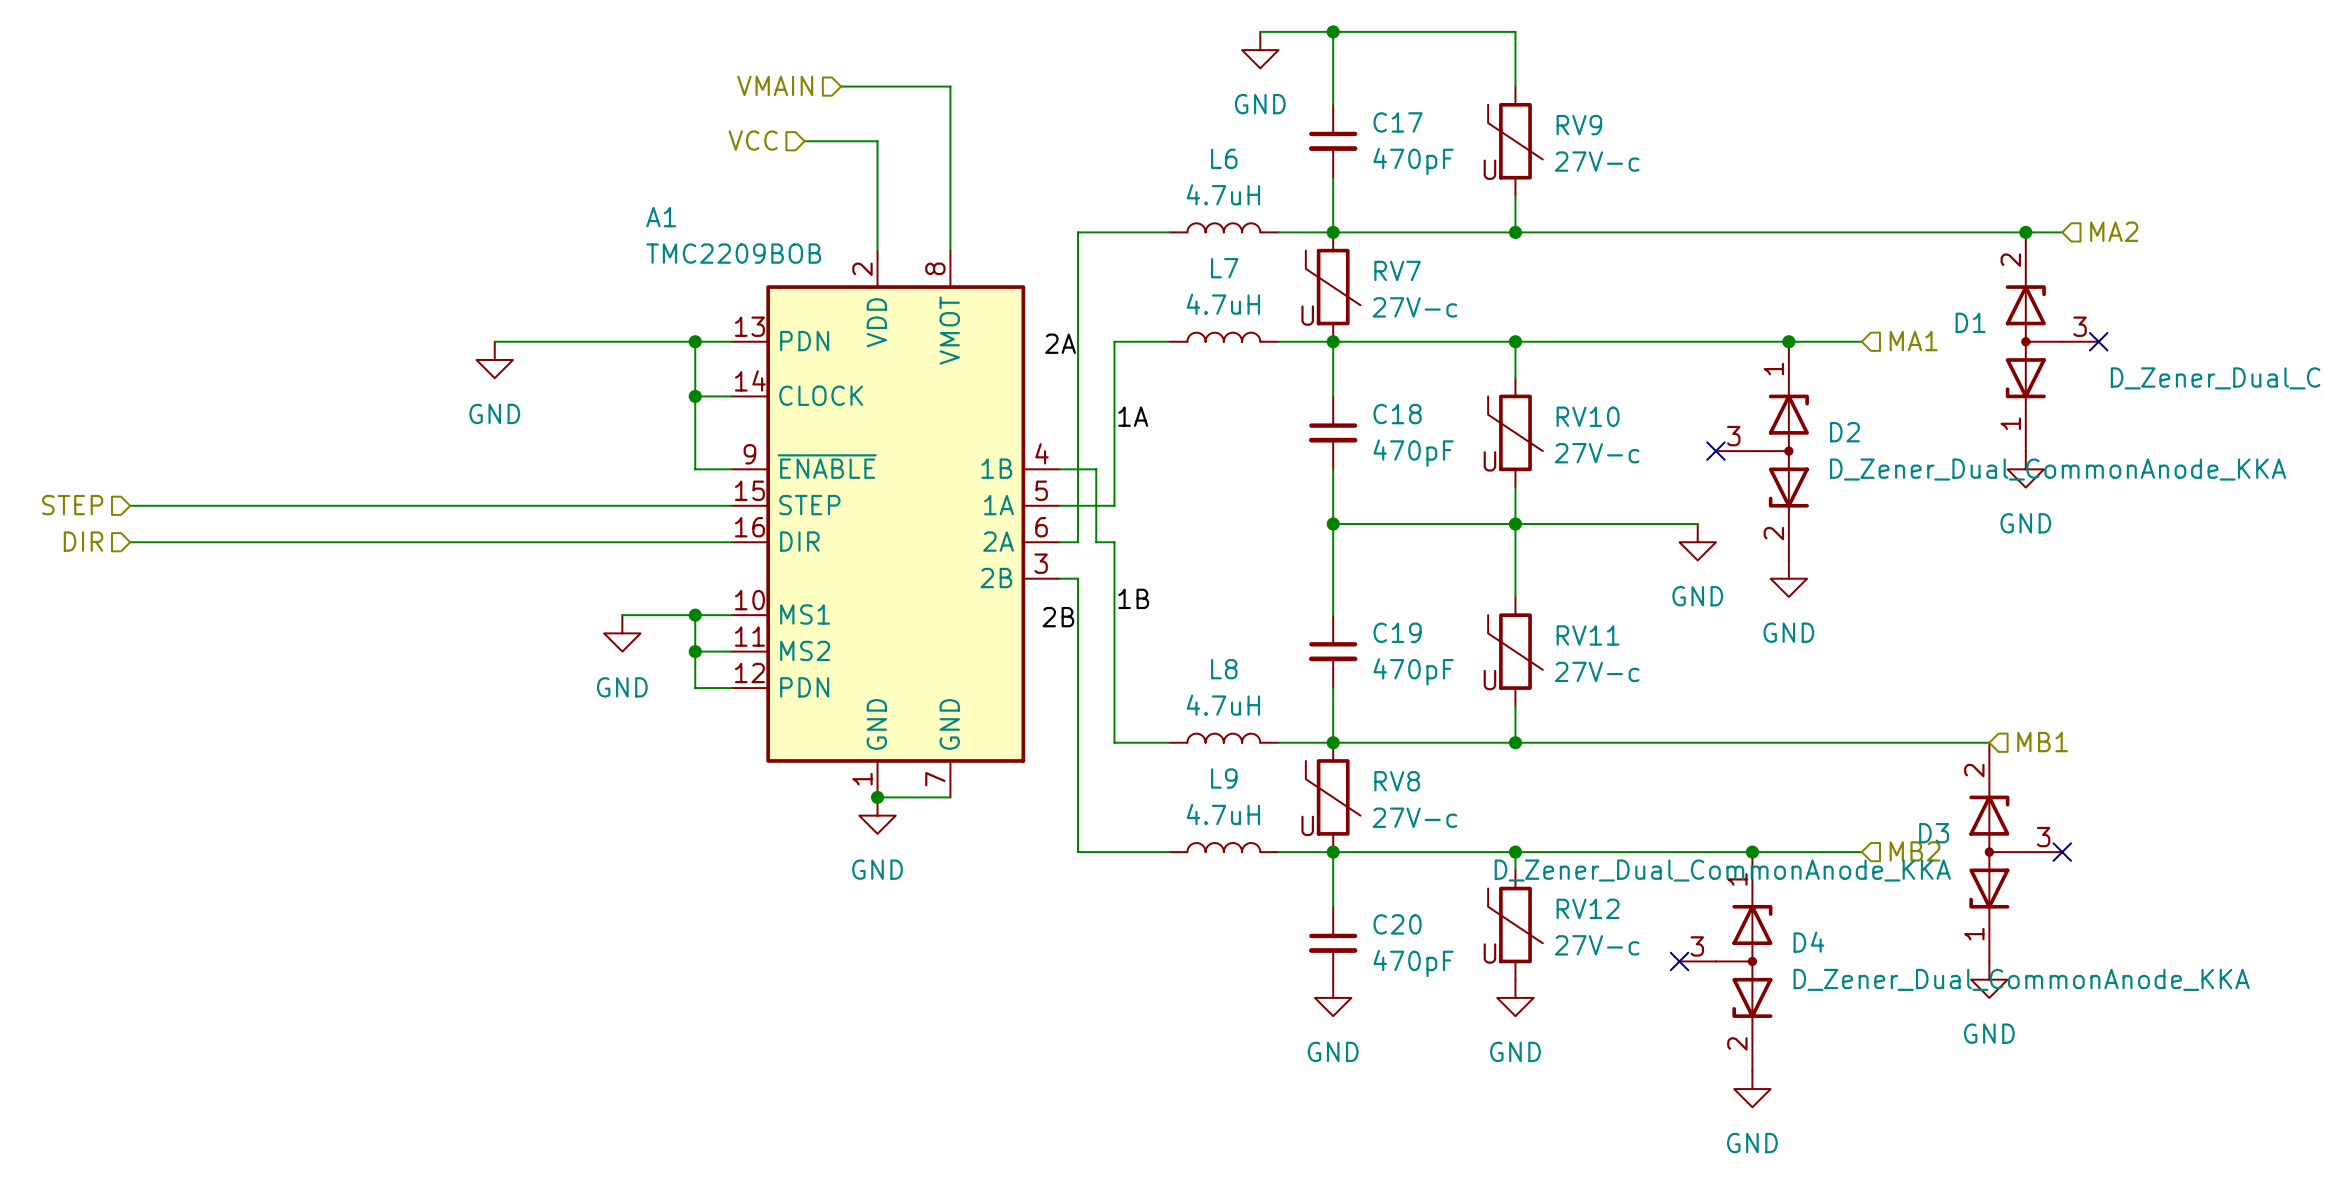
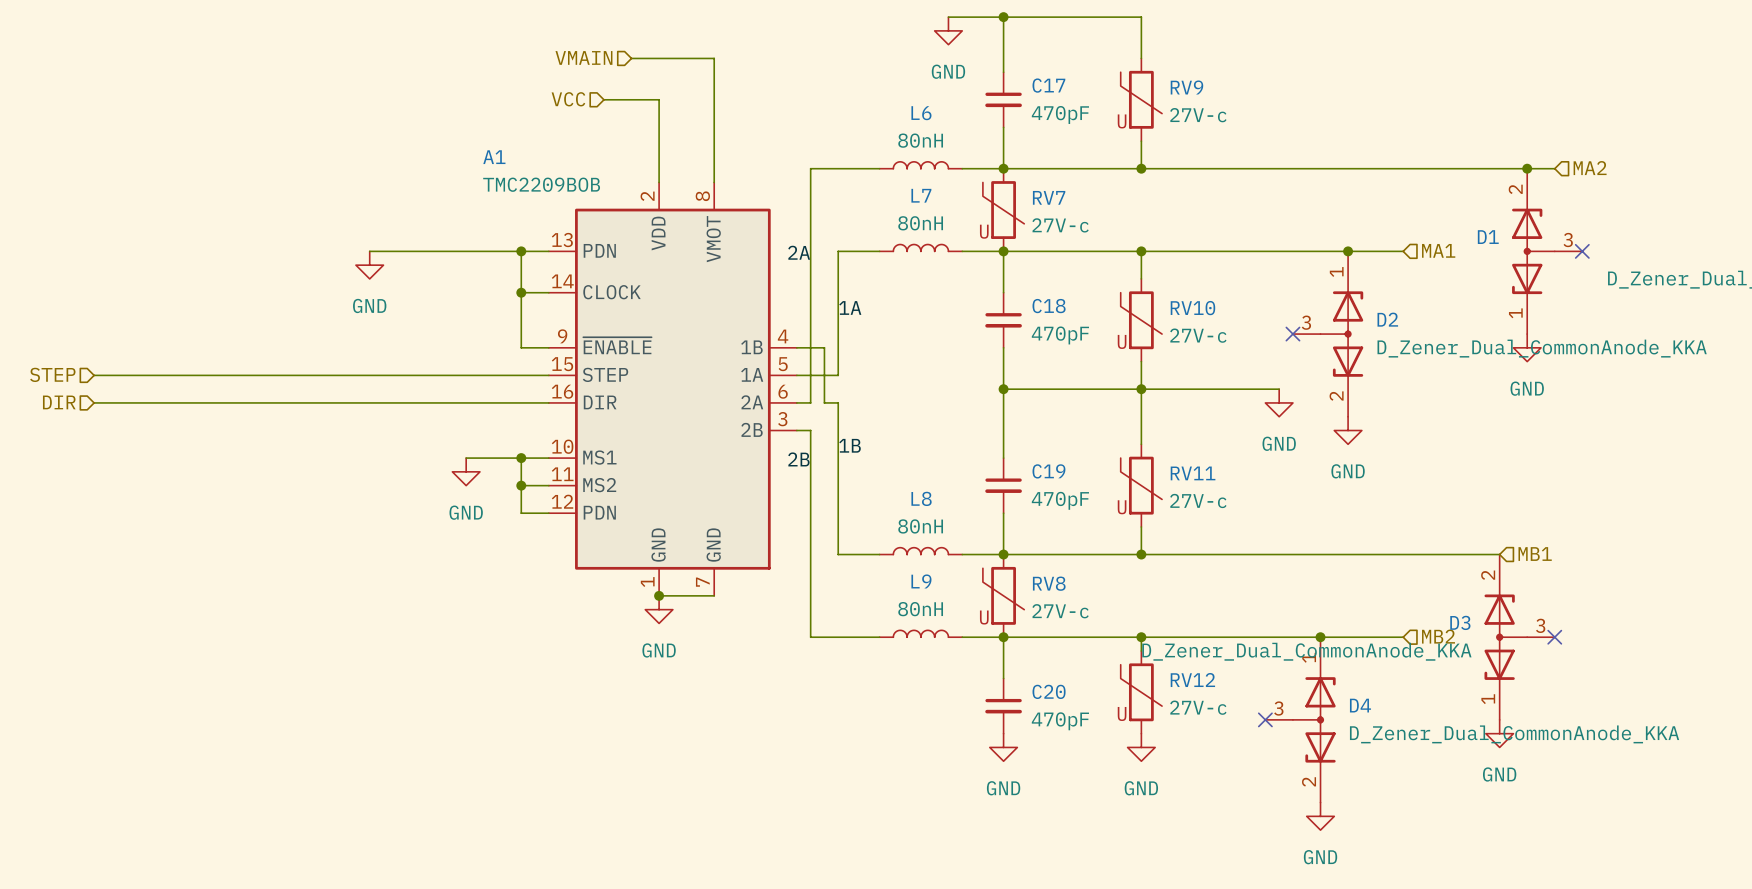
L6 value: 4.7uH (1223, 194) -> 80nH (920, 140)
L7 value: 4.7uH (1223, 304) -> 80nH (920, 223)
L8 value: 4.7uH (1223, 705) -> 80nH (920, 526)
L9 value: 4.7uH (1223, 814) -> 80nH (920, 609)

